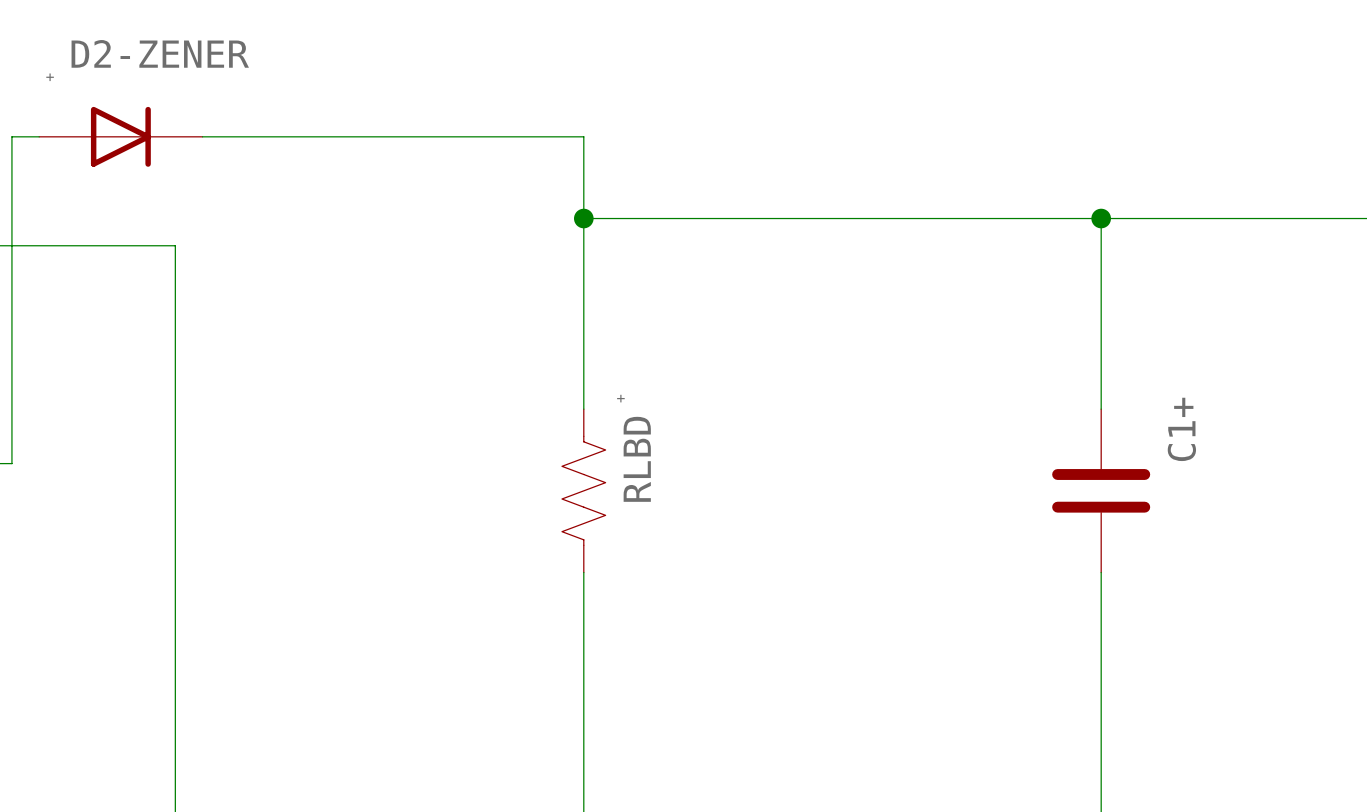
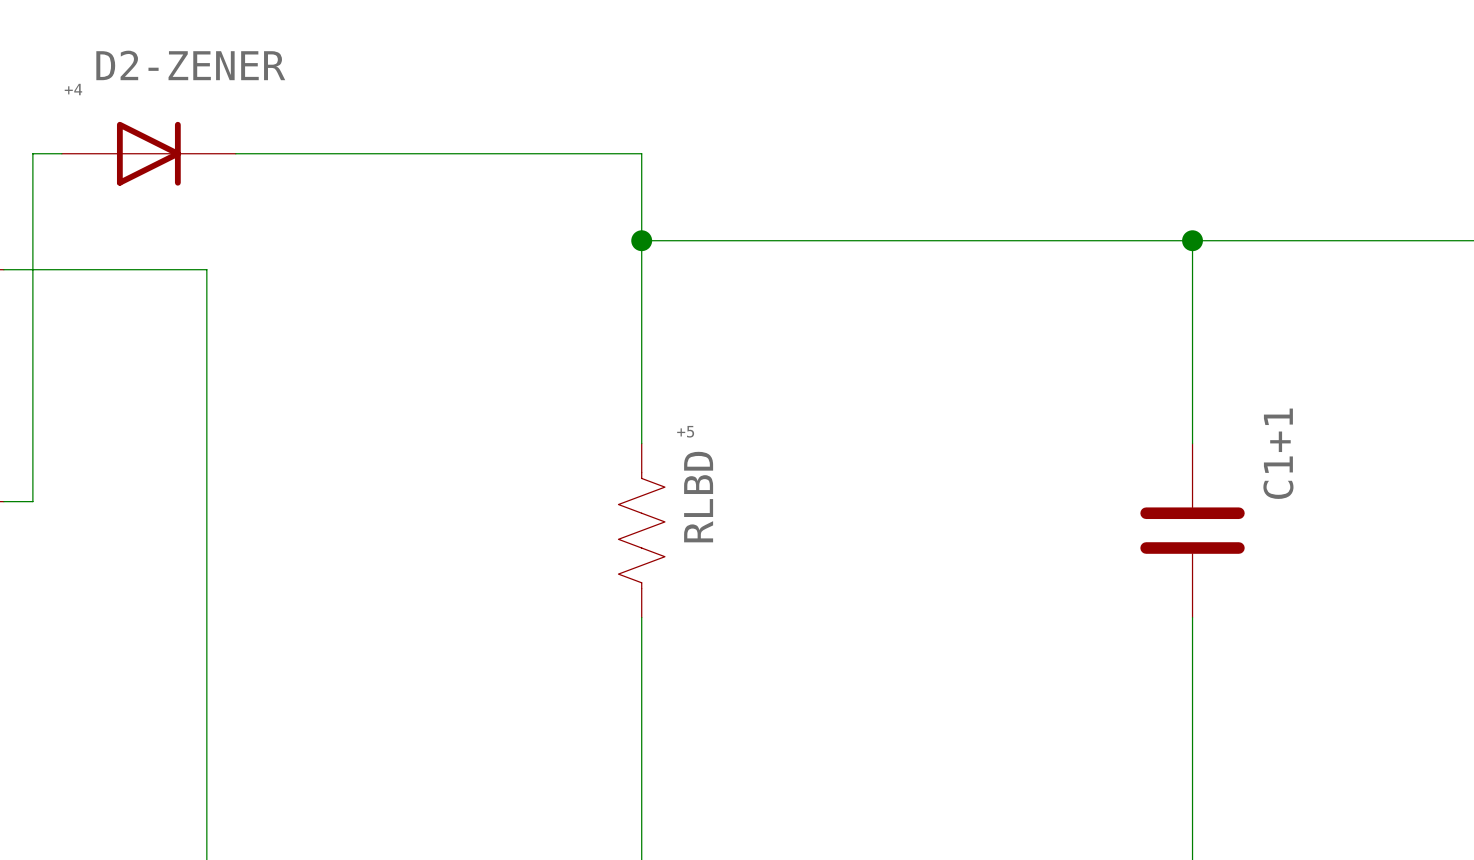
+4 name: + (50, 77) -> +4 (73, 89)
+5 name: + (620, 398) -> +5 (685, 431)
C1+ name: C1+ (1181, 429) -> C1+1 (1278, 453)

